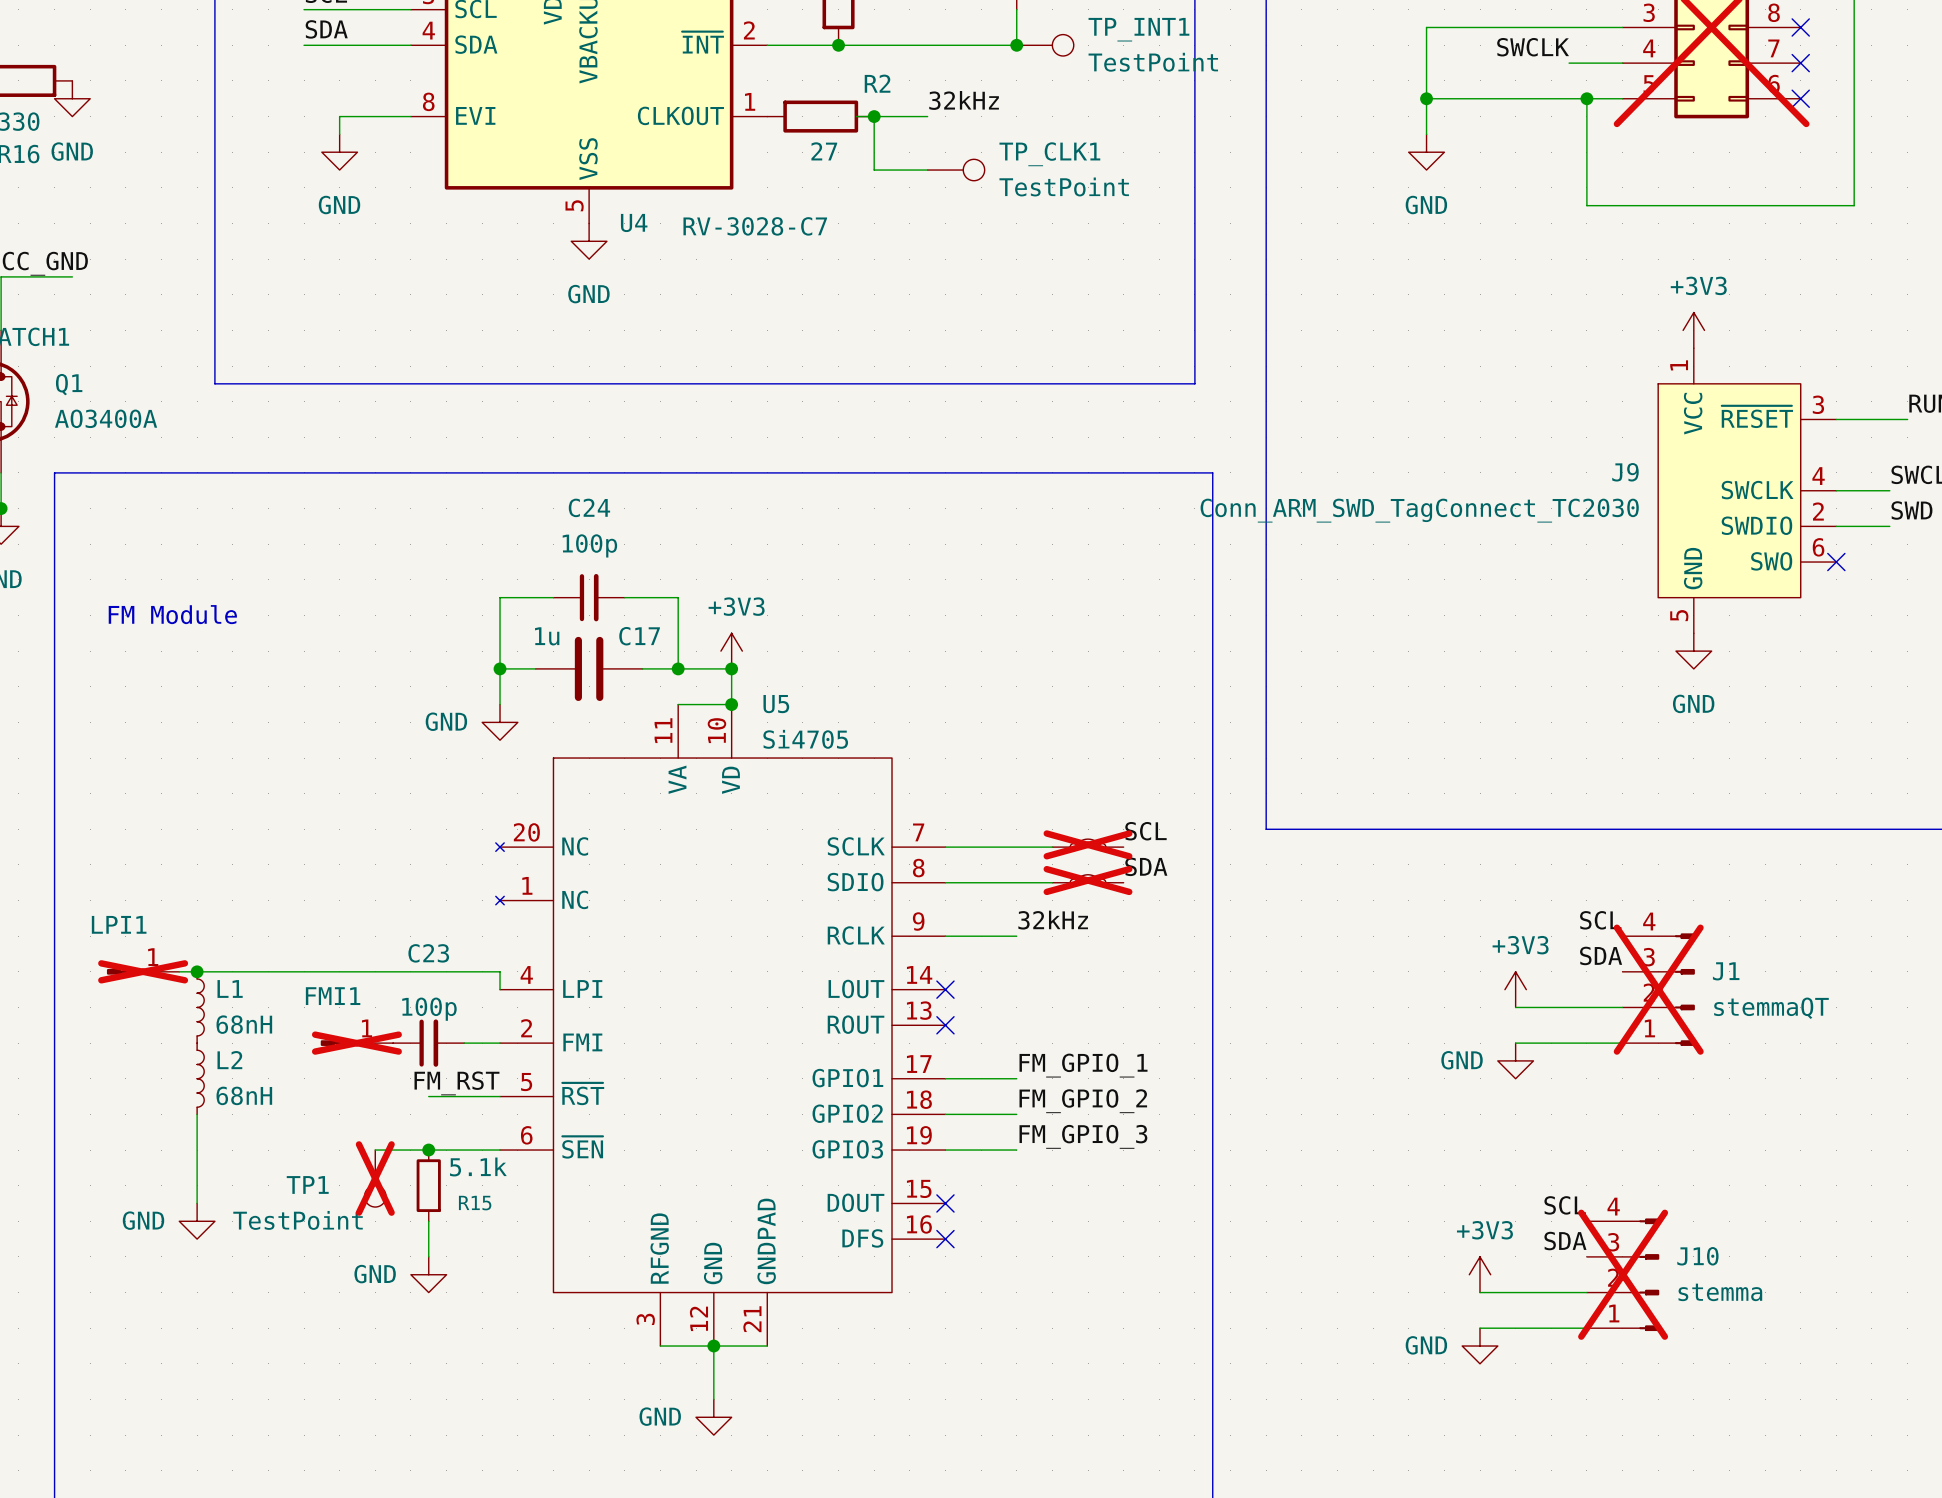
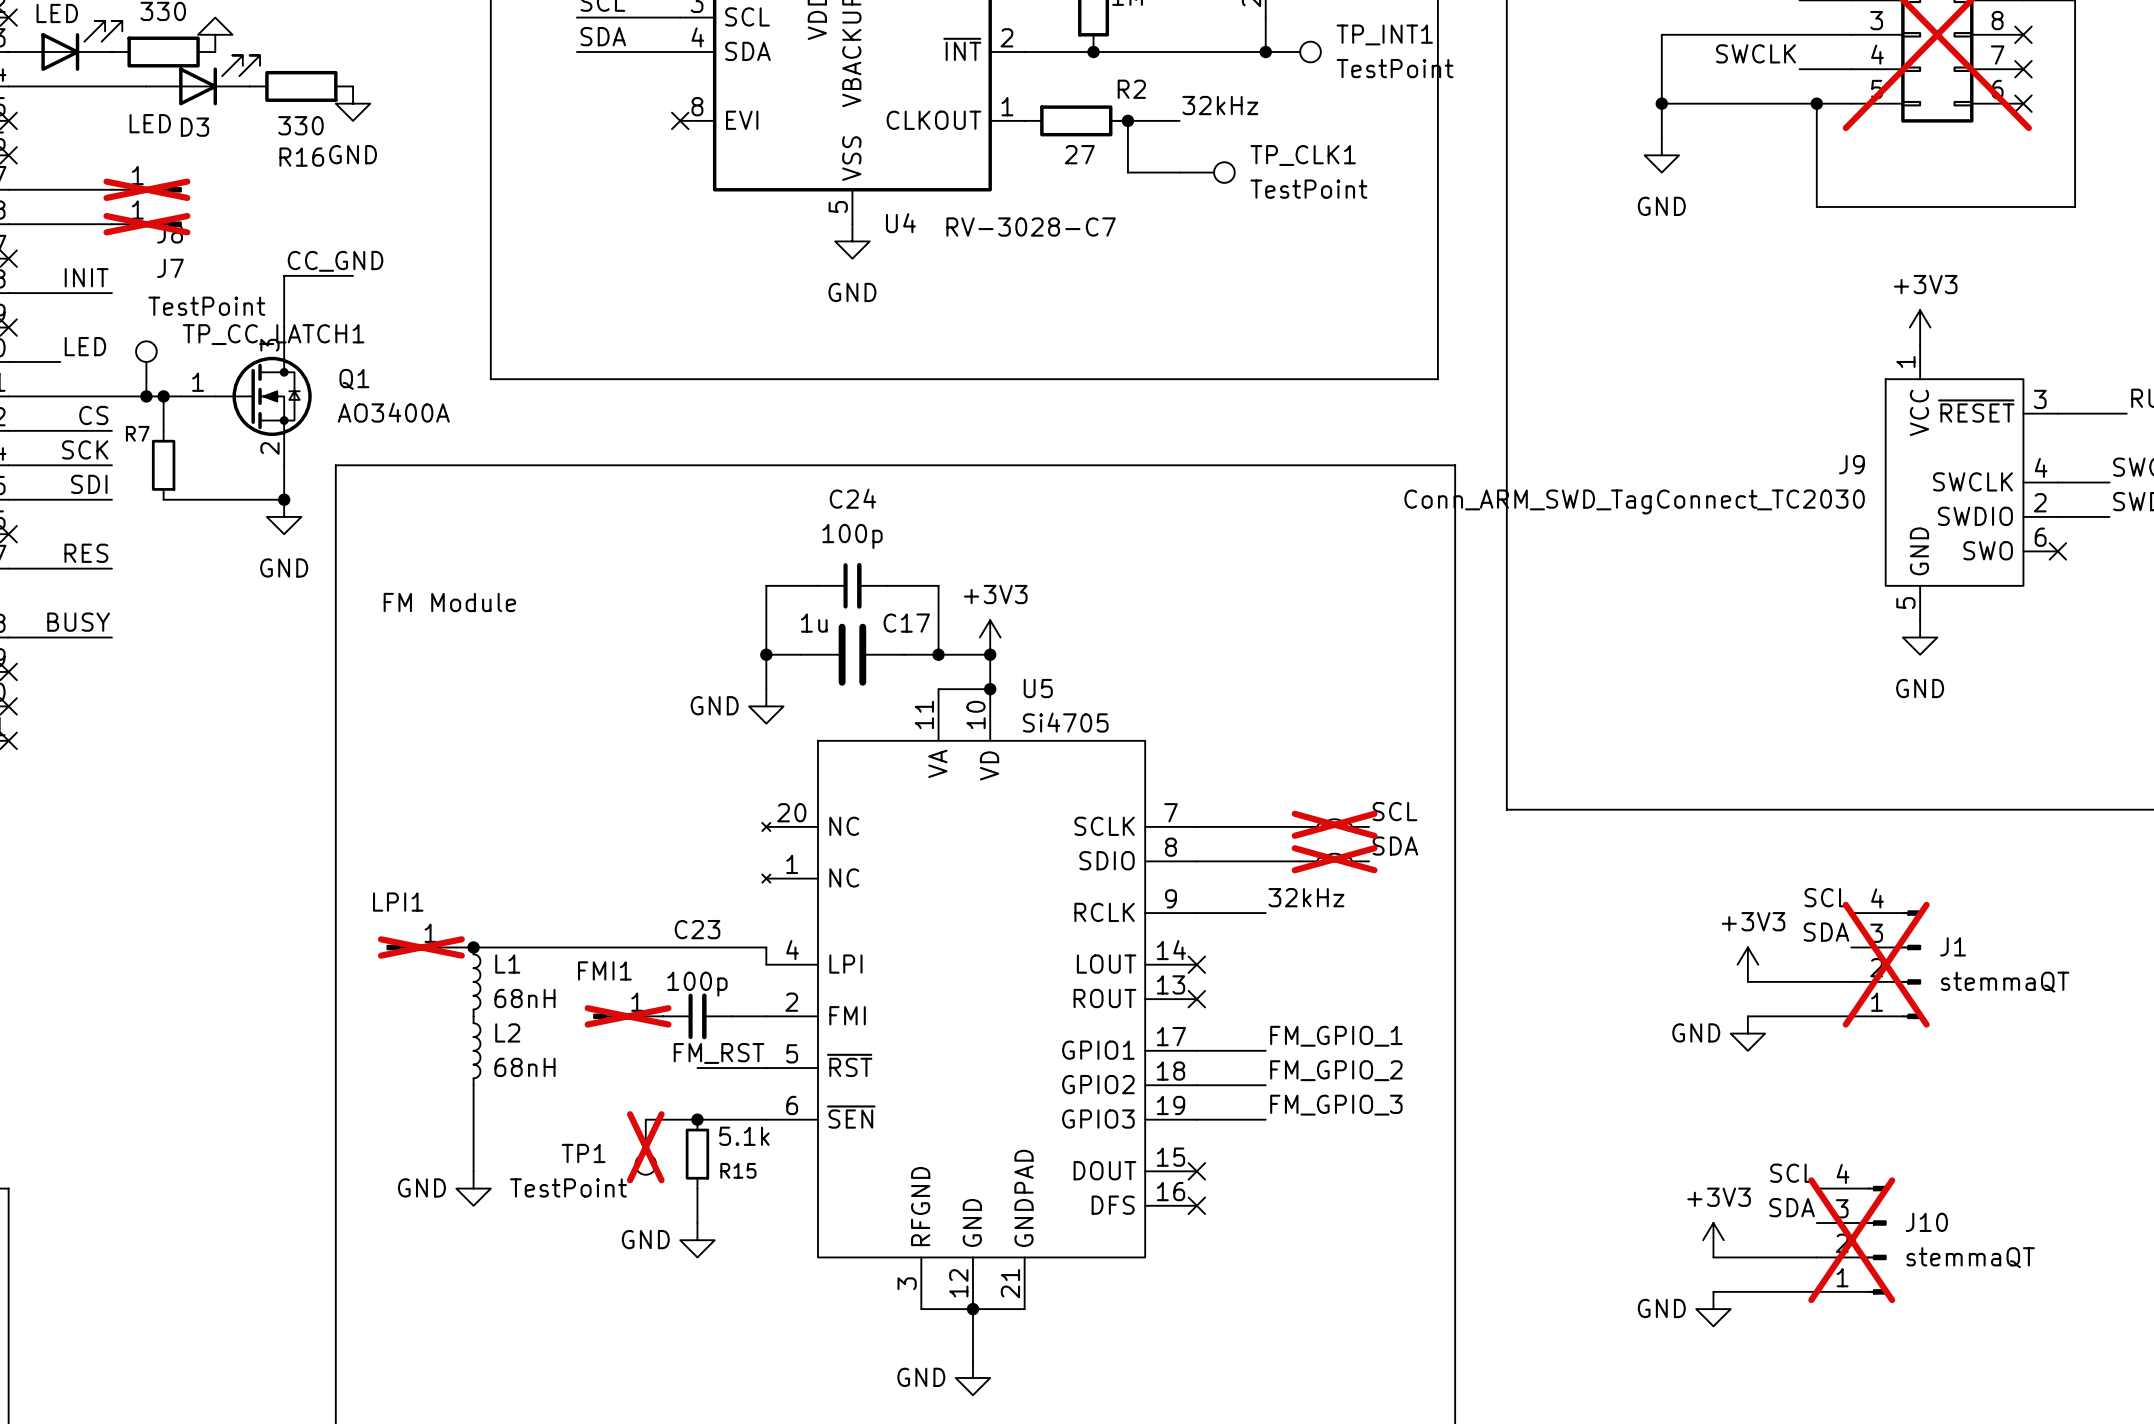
wire: (410, 116) (339, 116) (339, 134) -> none
no-connect mark: none -> (680, 120)
power symbol: GND (339, 152) -> none
J10 value: stemma (1720, 1292) -> stemmaQT (1970, 1257)

